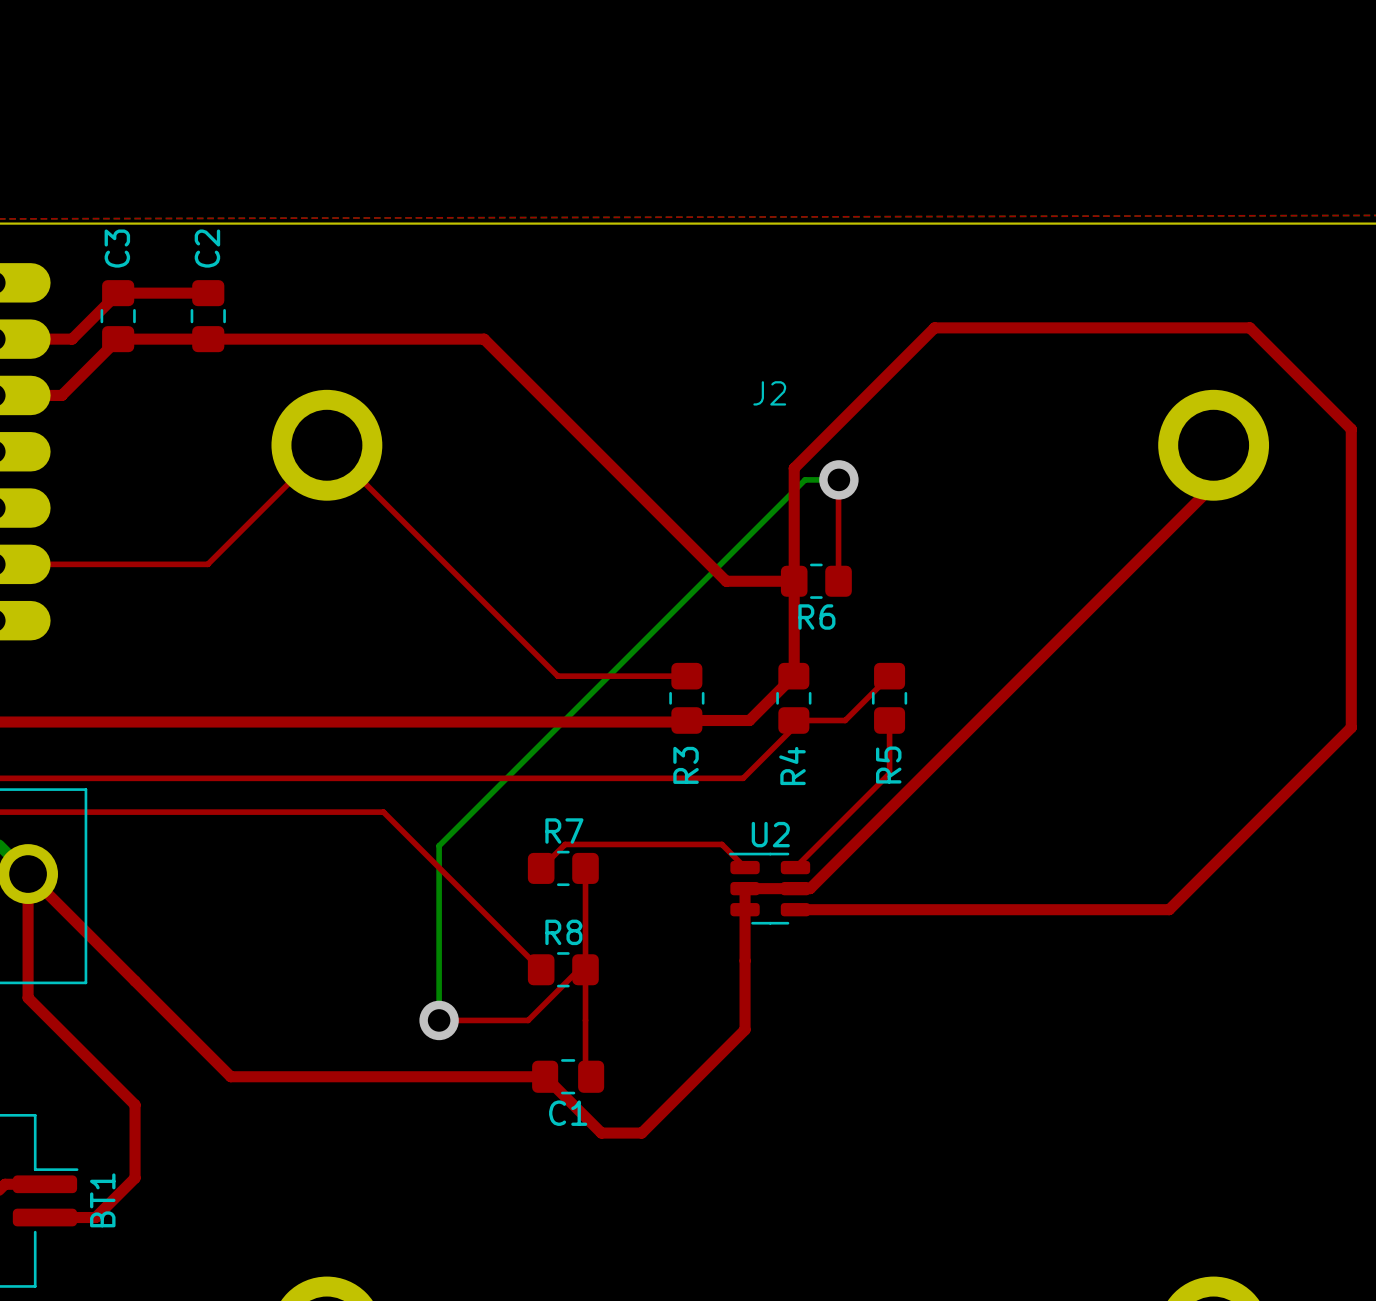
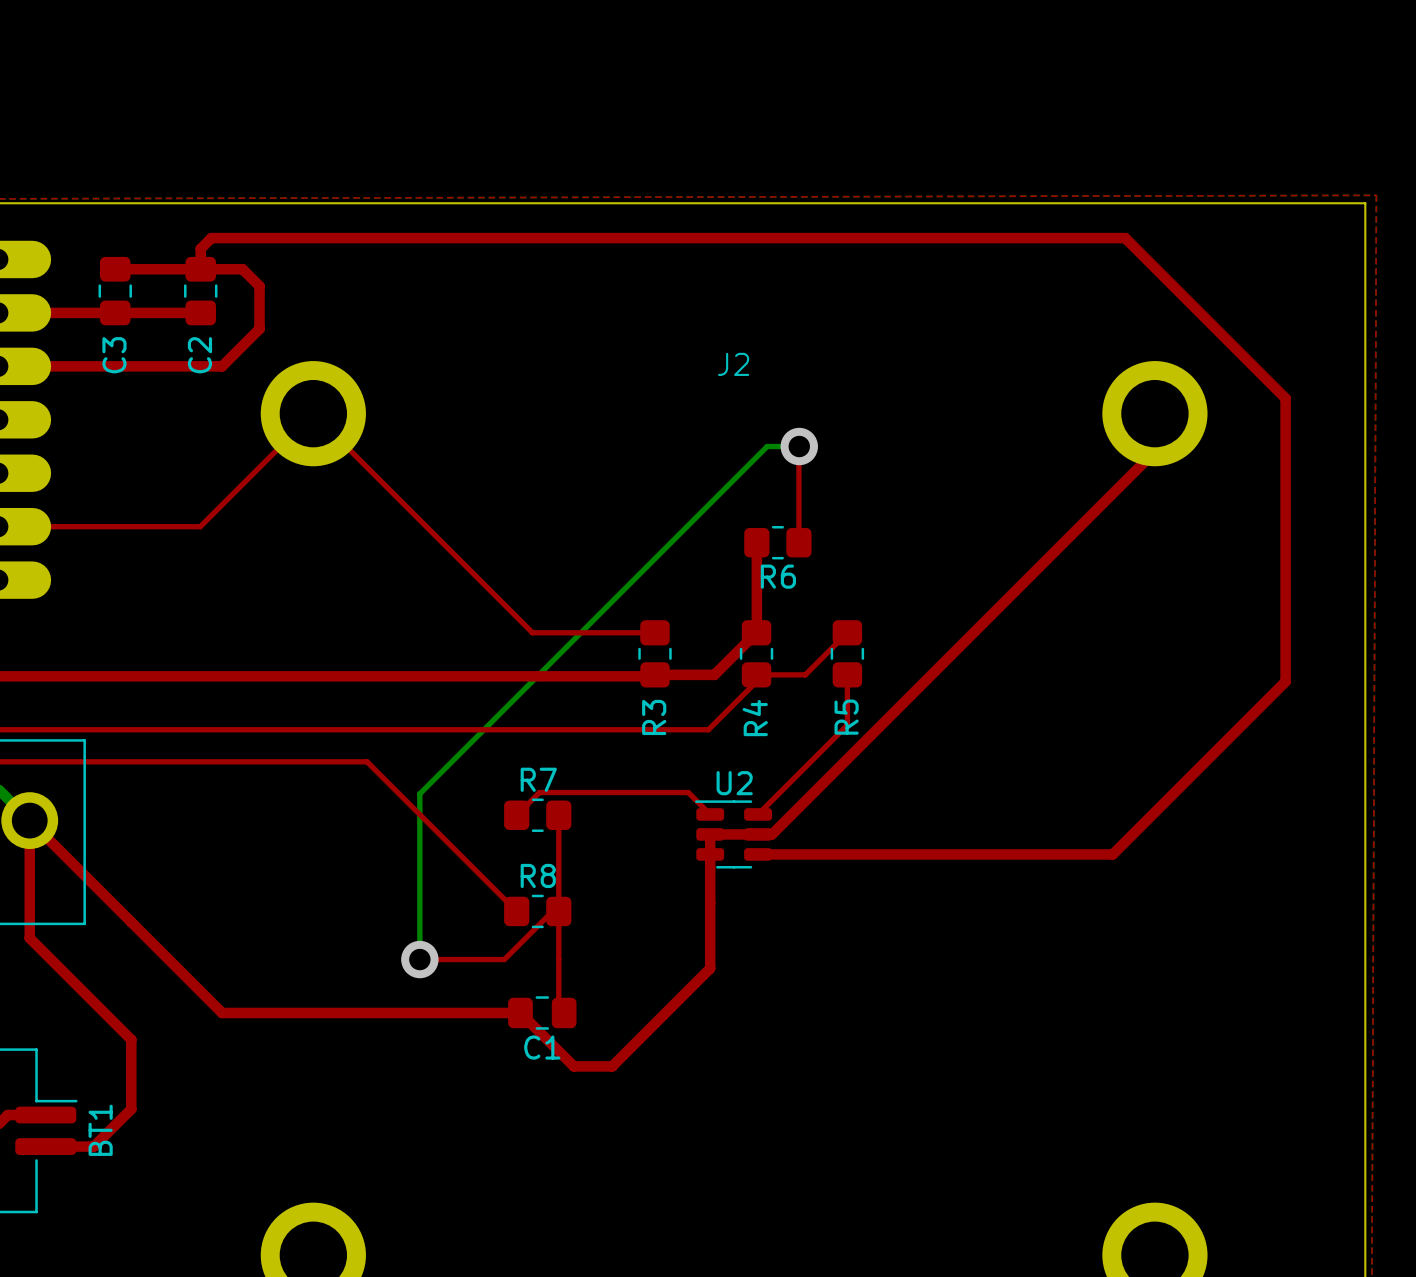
C3 name position: C3 (117, 248) -> C3 (114, 355)
C2 name position: C2 (207, 248) -> C2 (199, 355)
top track: (118, 293) (72, 339) -> (115, 312) (71, 312)
top track: (1249, 327) (934, 327) (794, 468) (794, 581) (726, 581) (484, 339) (208, 339) -> (1189, 302) (1125, 238) (211, 238) (200, 248) (200, 269) (242, 269) (259, 286) (259, 328) (222, 366) (61, 366)
top track: (118, 339) (61, 395) -> none

